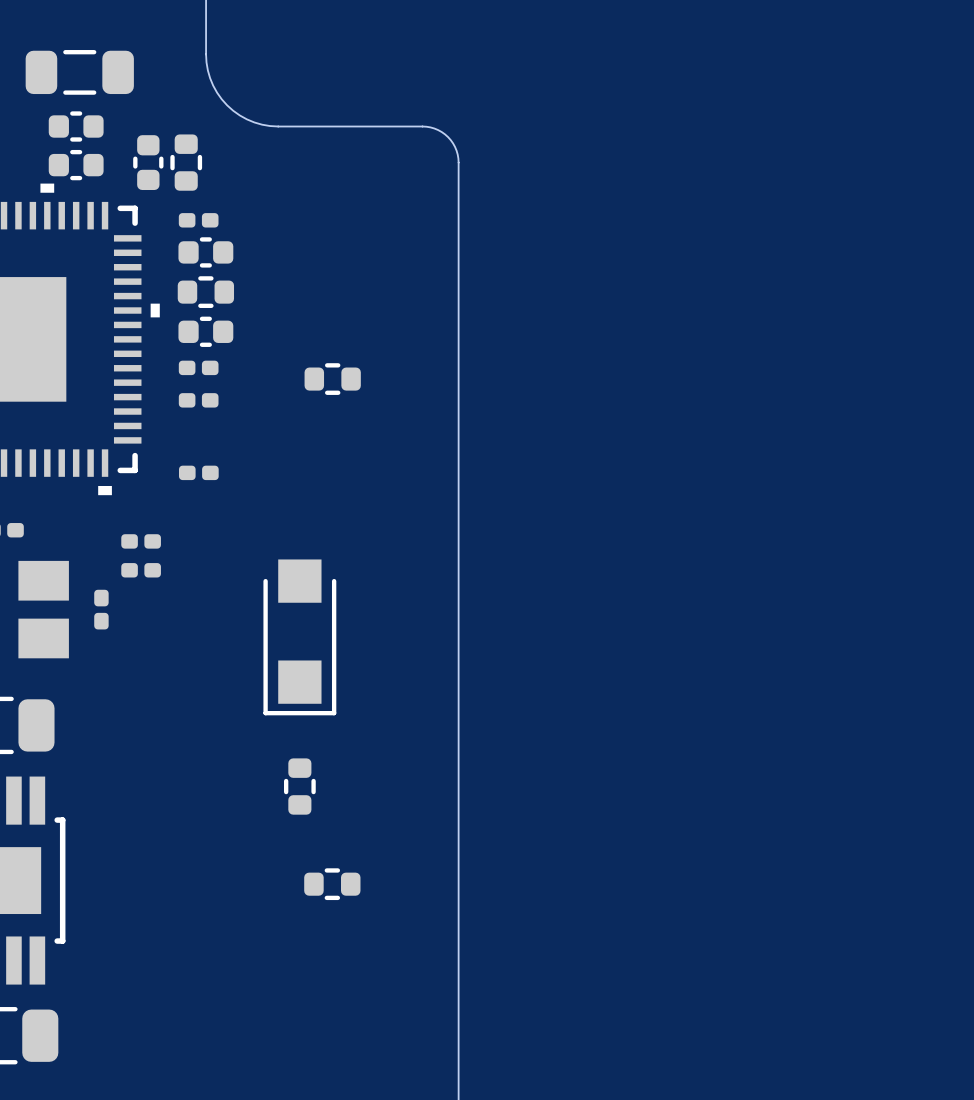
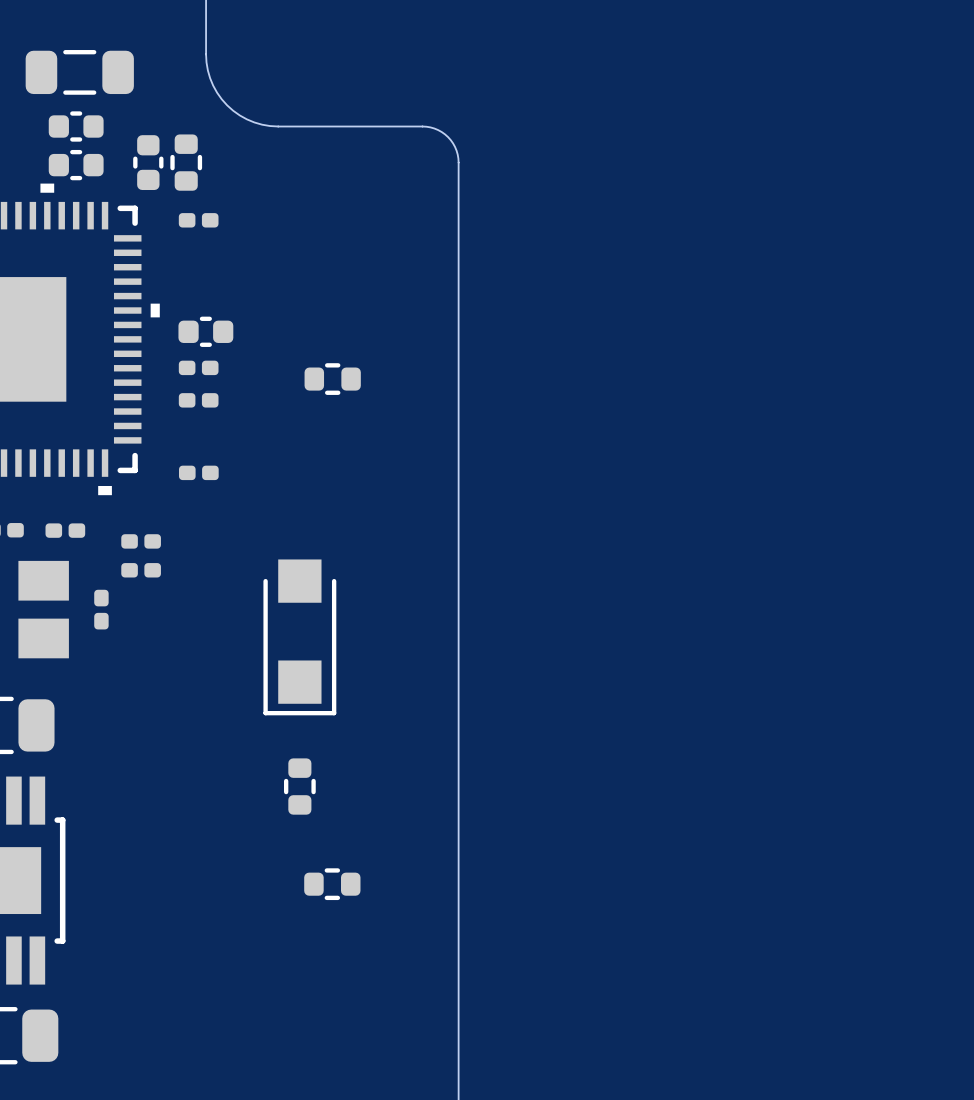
part: (205, 252) -> none
part: (205, 292) -> none
part: none -> (65, 530)

